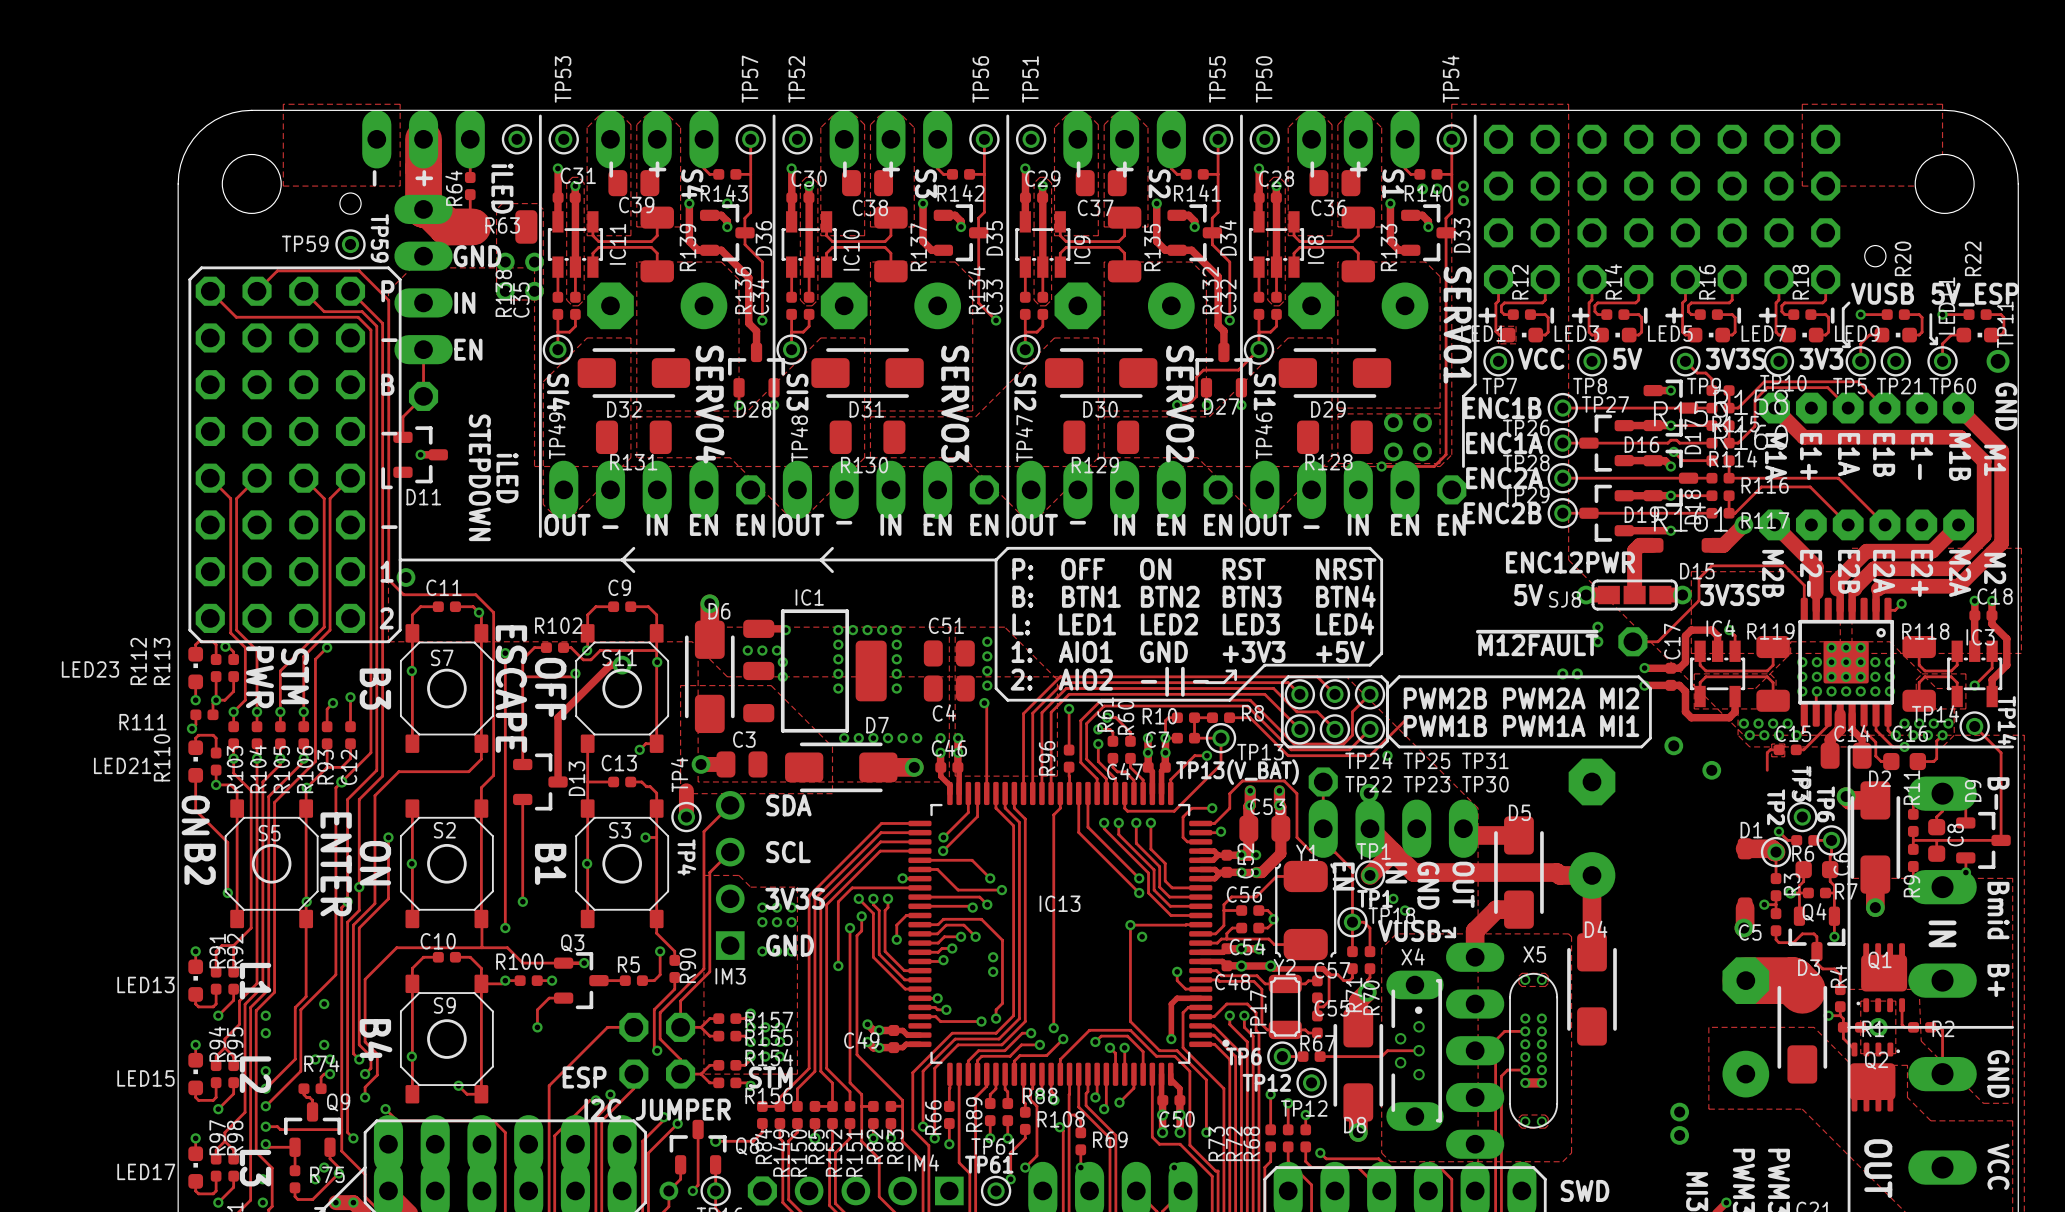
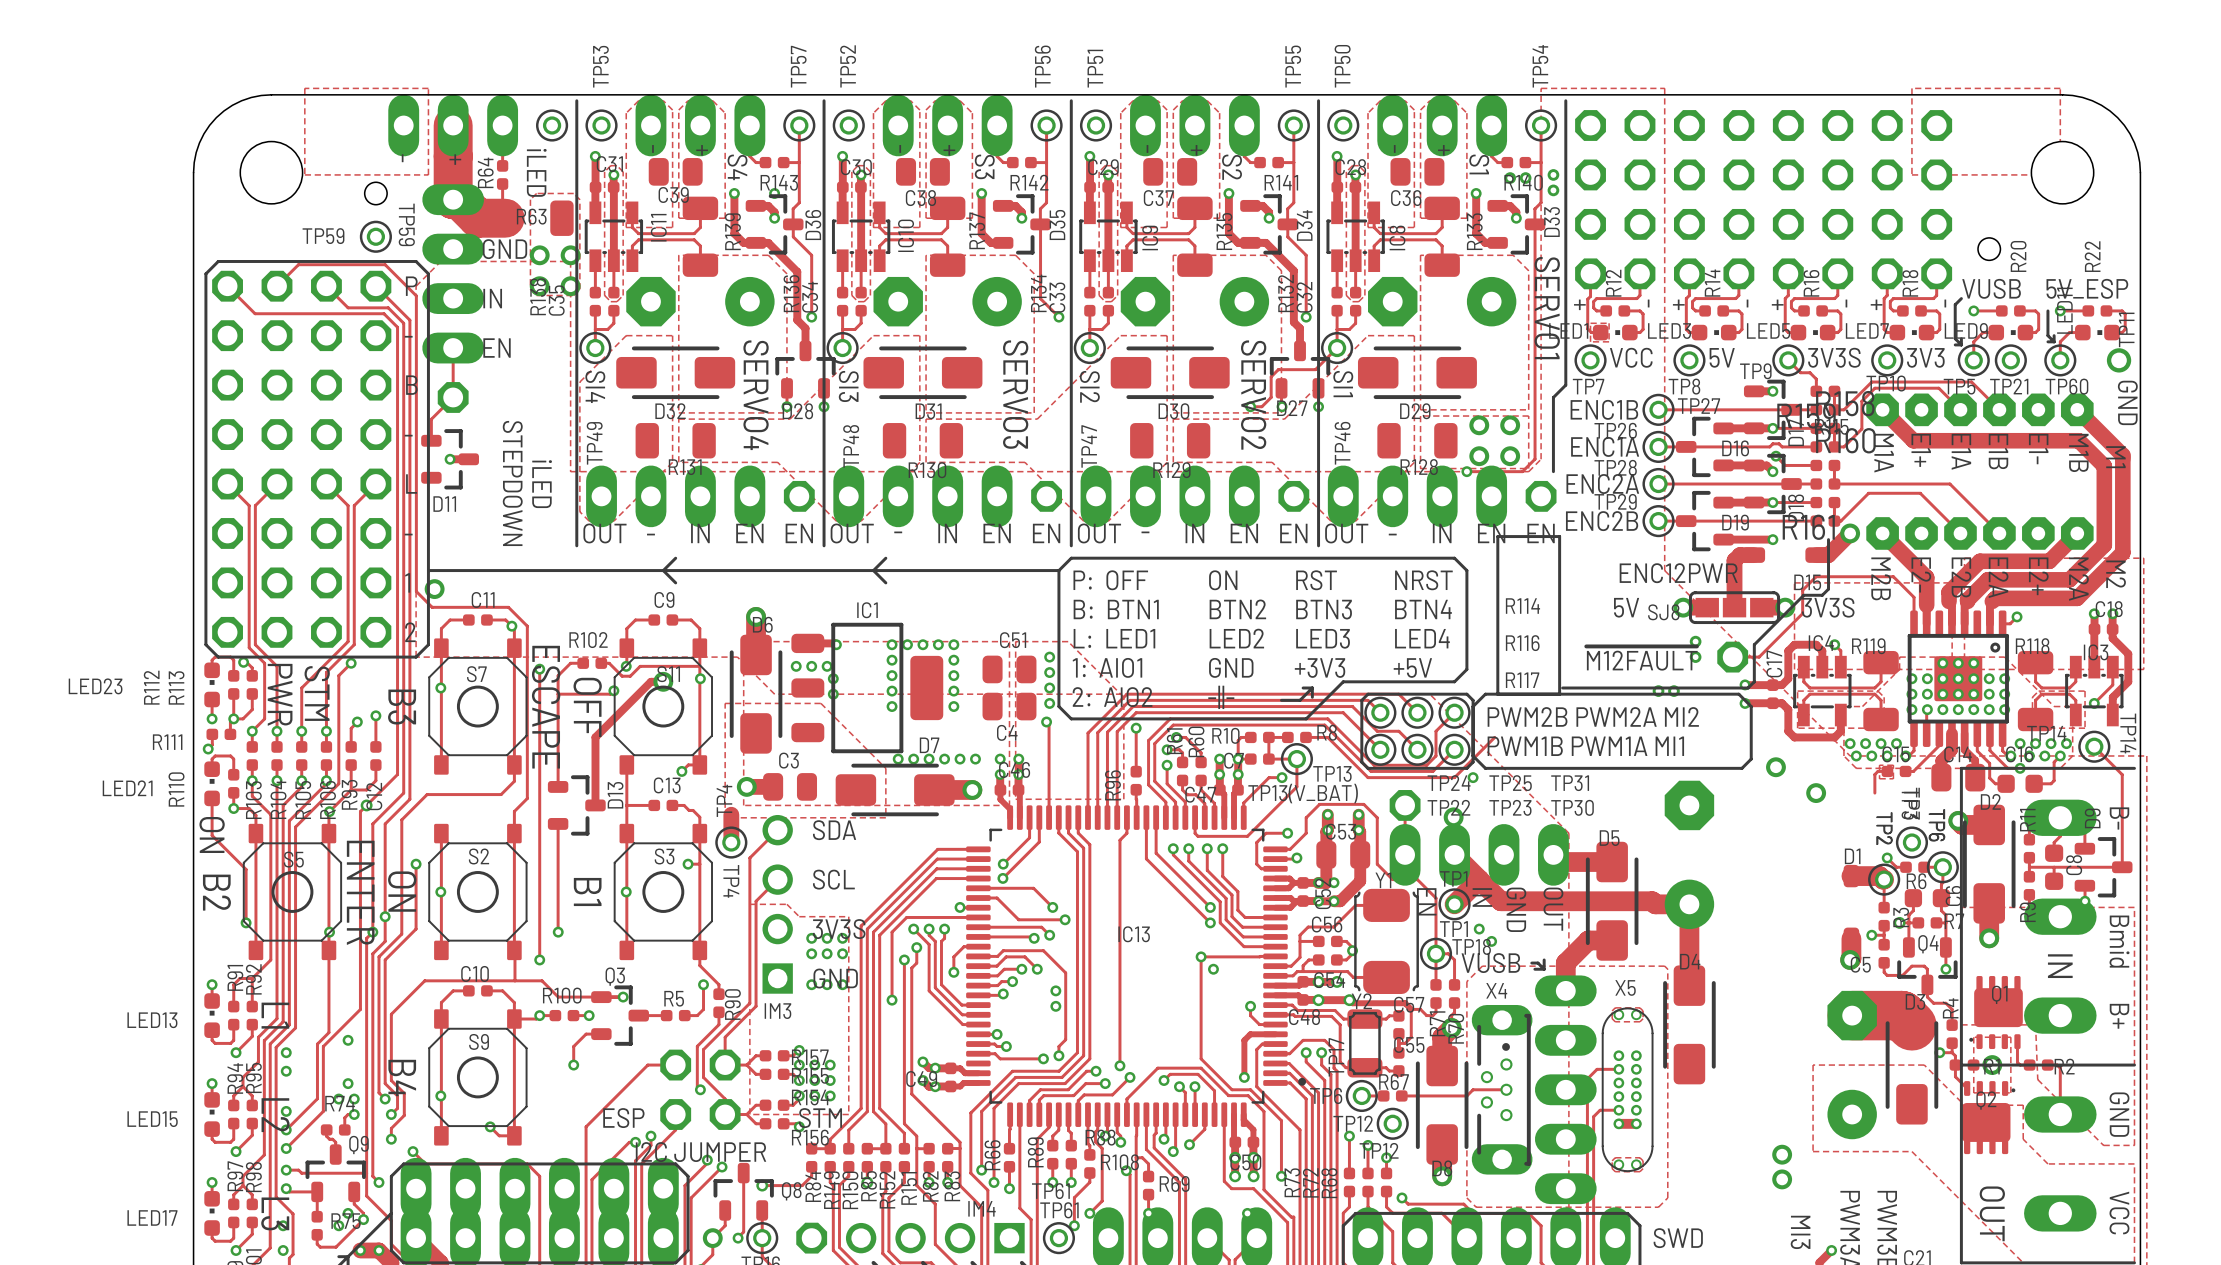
TP9 name position: TP9 (1703, 386) -> TP9 (1755, 371)
R114 name position: R114 (1733, 458) -> R114 (1522, 606)
R116 name position: R116 (1765, 485) -> R116 (1522, 643)
R117 name position: R117 (1765, 520) -> R117 (1522, 680)
line: none -> (1828, 539) (1828, 589) (1822, 595) (1803, 595) (1754, 644) (1754, 681) (1748, 687) (1562, 687)
line: none -> (1497, 694) (1497, 536) (1559, 536) (1559, 694)

